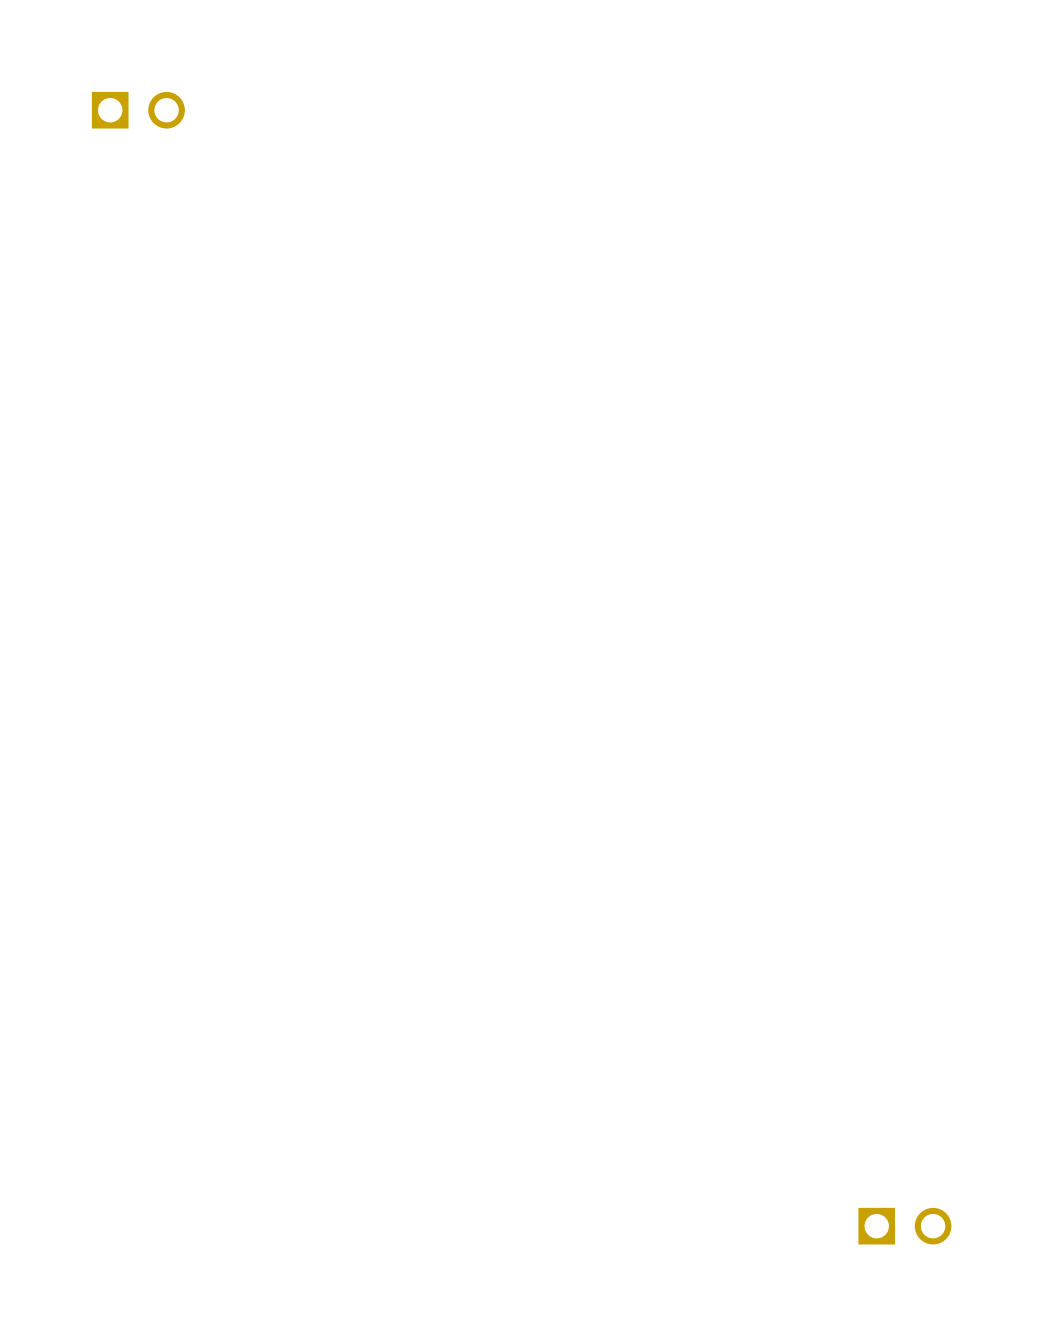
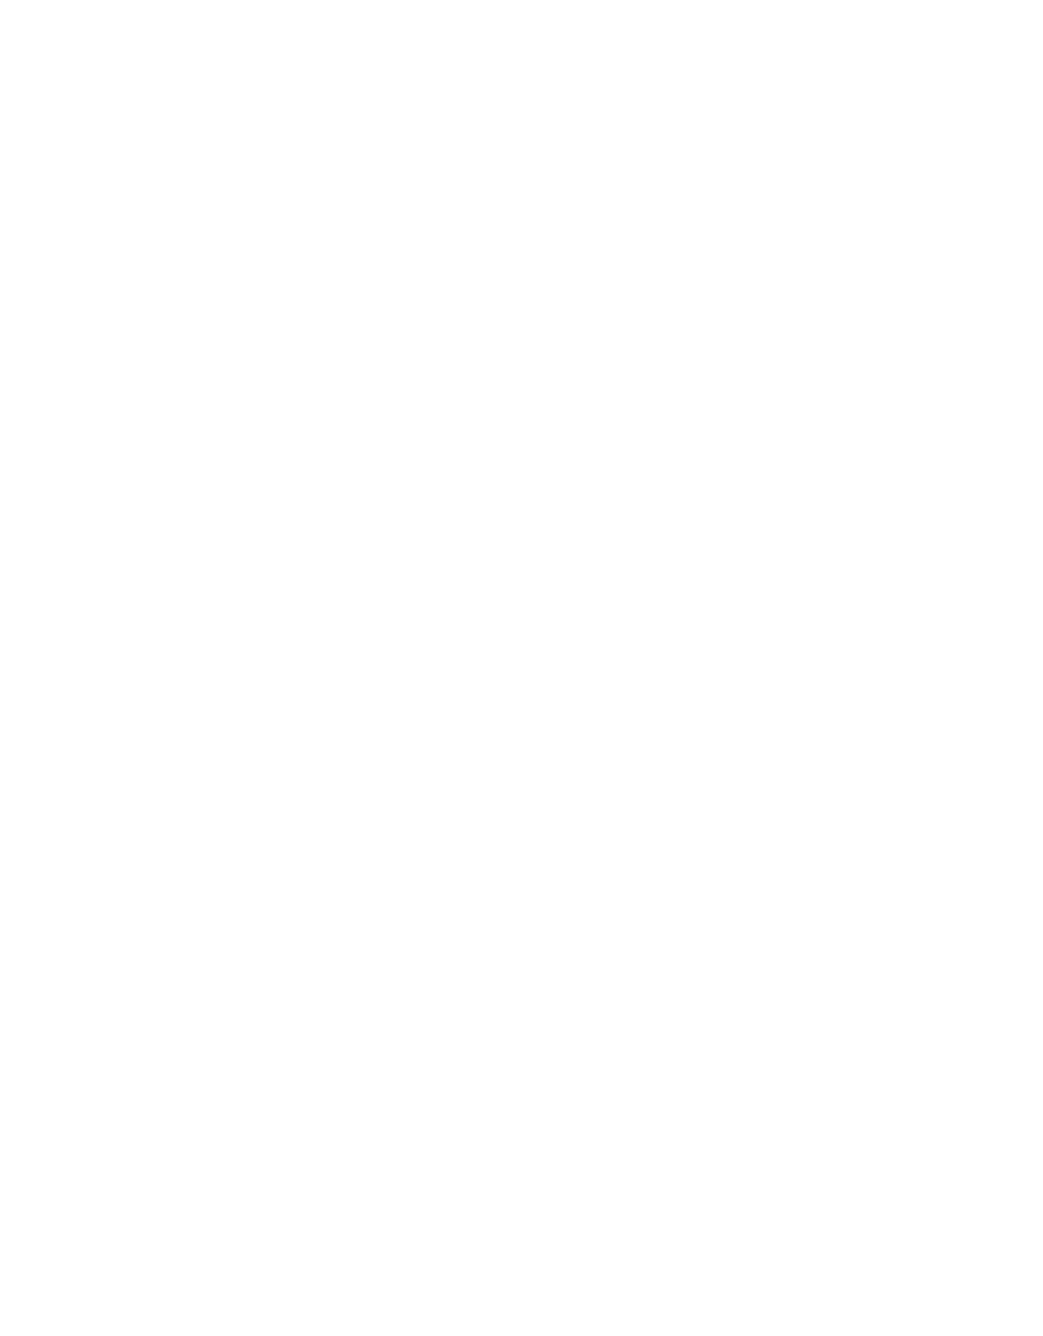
part: (138, 110) -> none
part: (904, 1226) -> none

